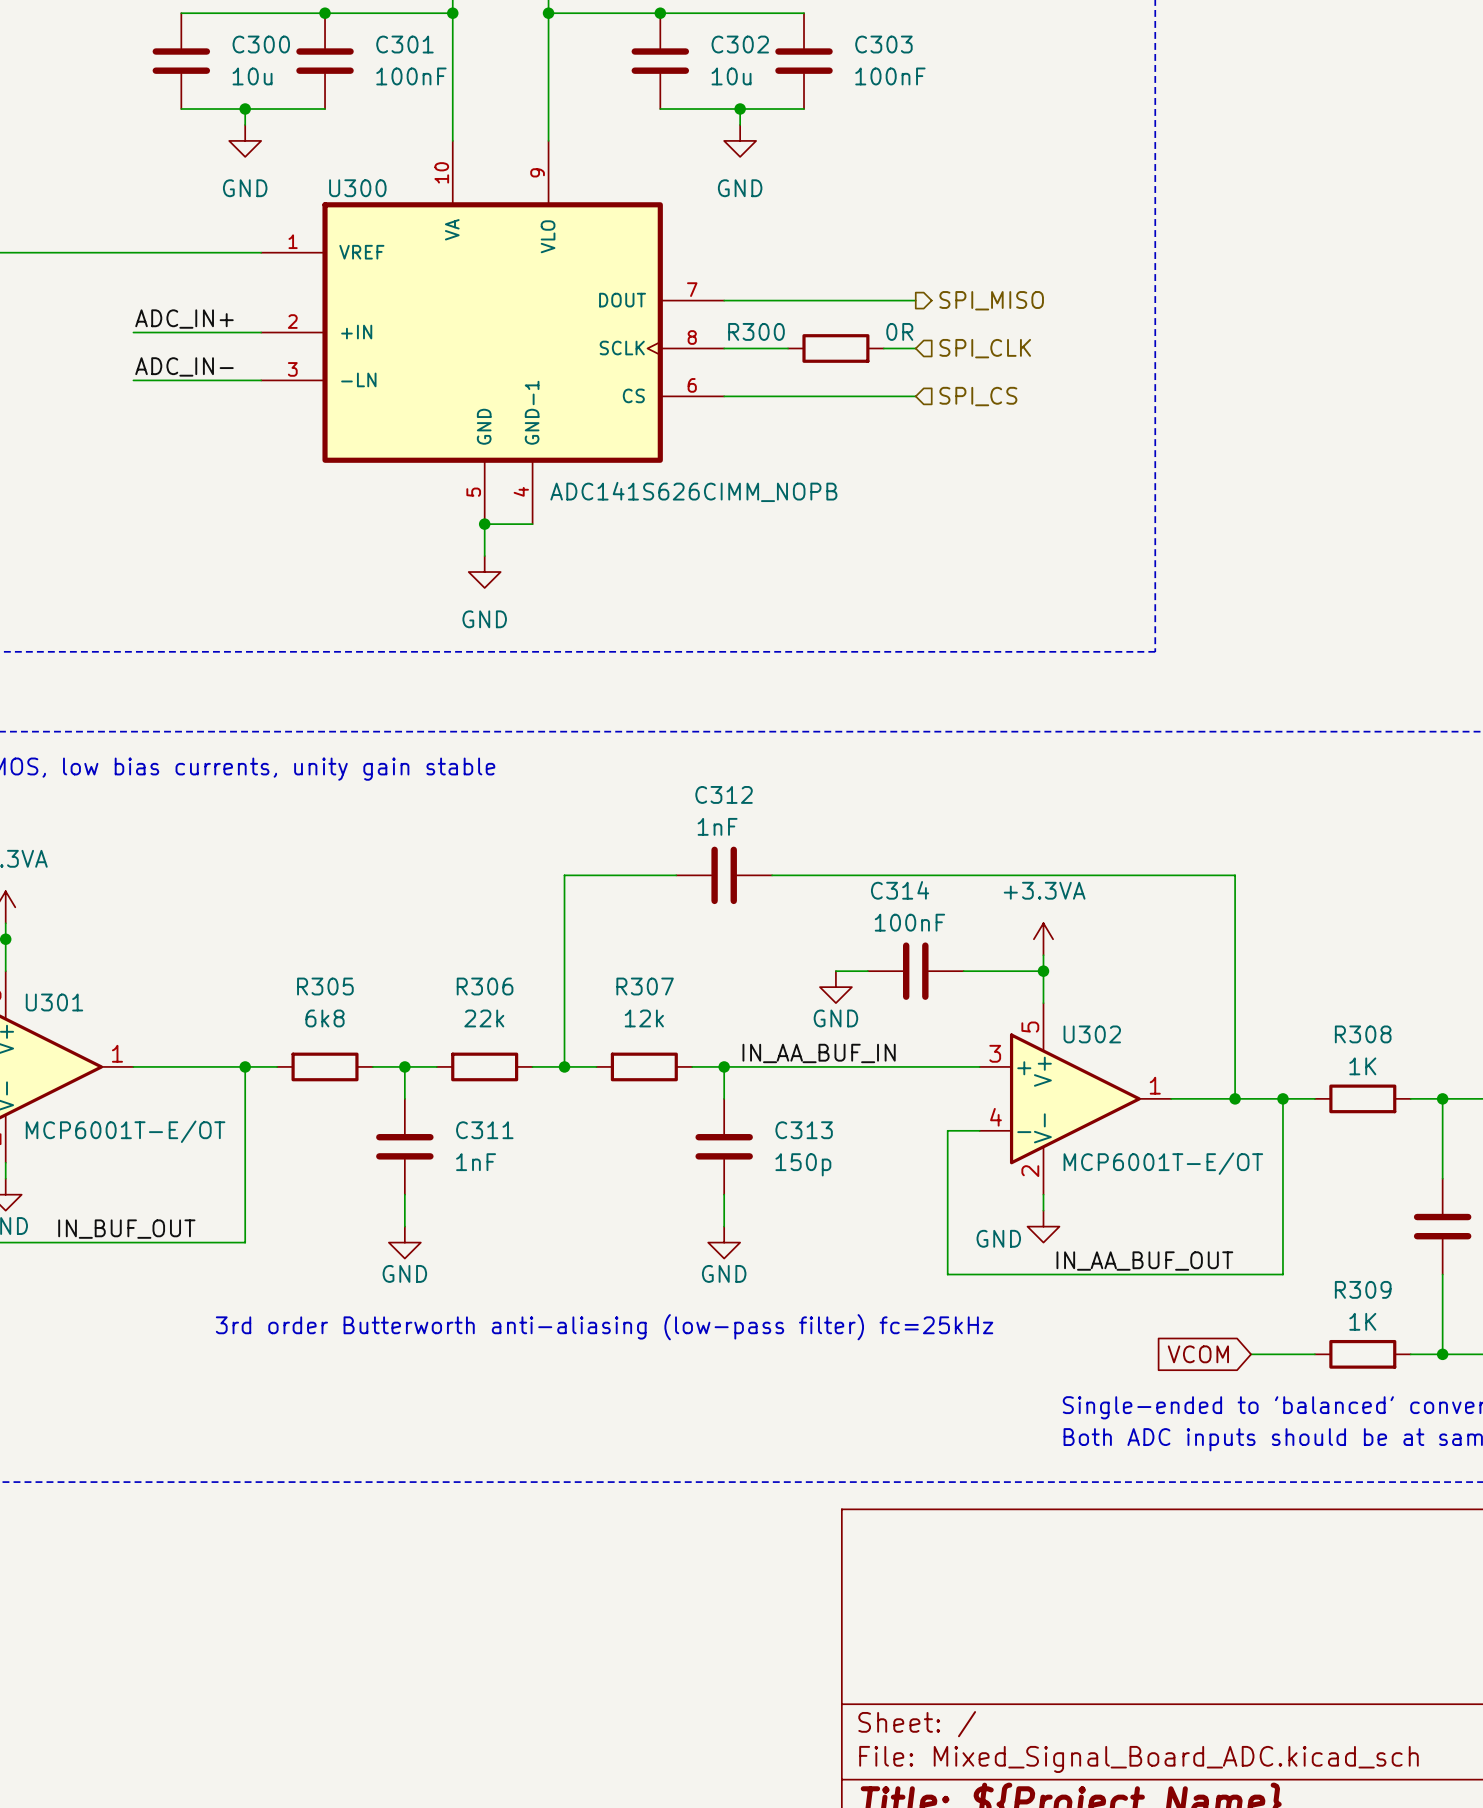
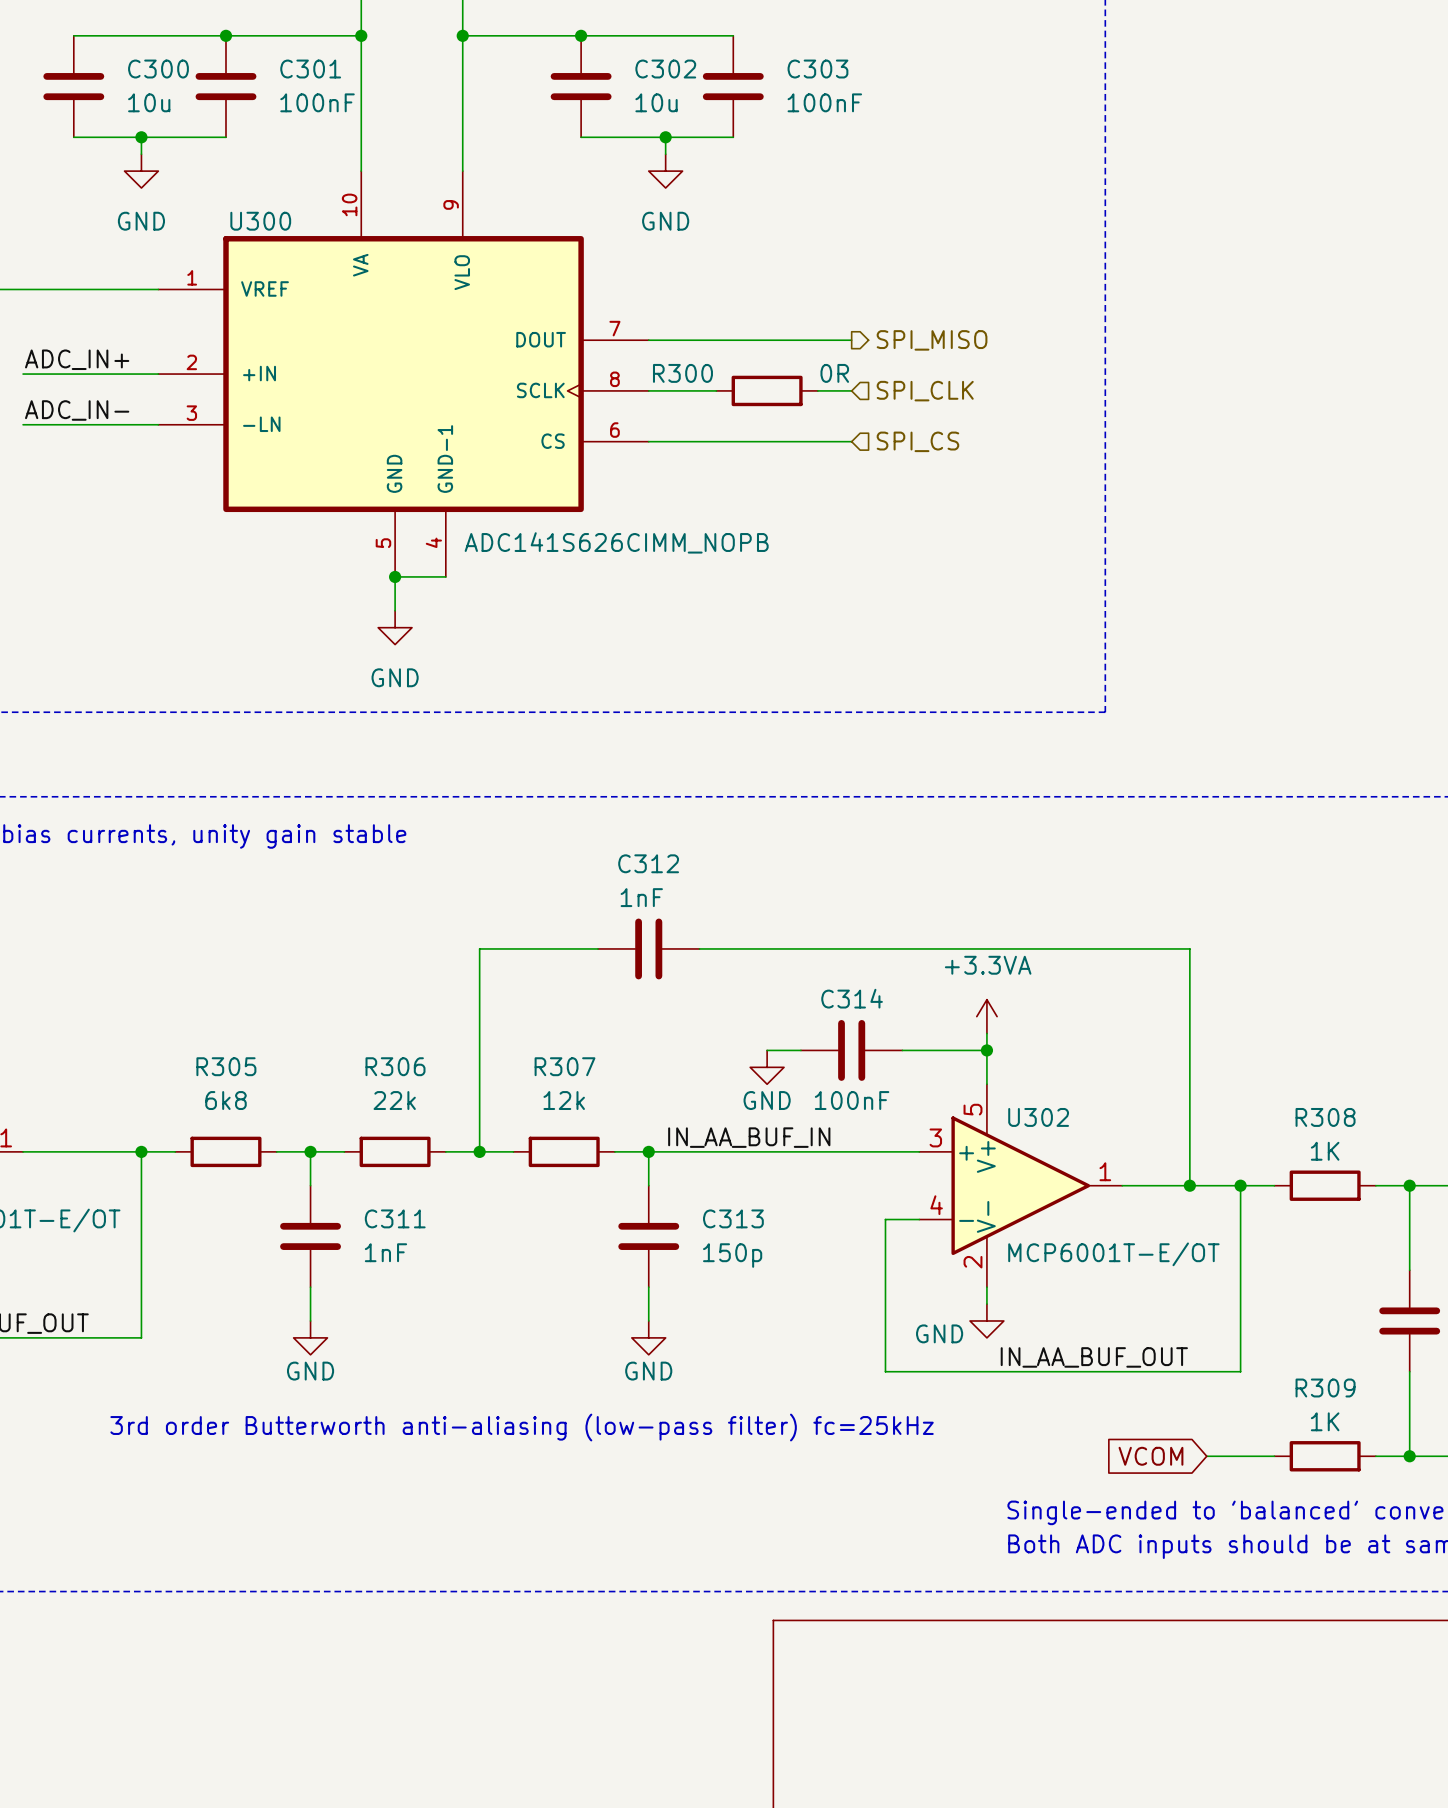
C314 name position: C314 (900, 890) -> C314 (852, 998)
C314 value position: 100nF (909, 922) -> 100nF (852, 1100)

